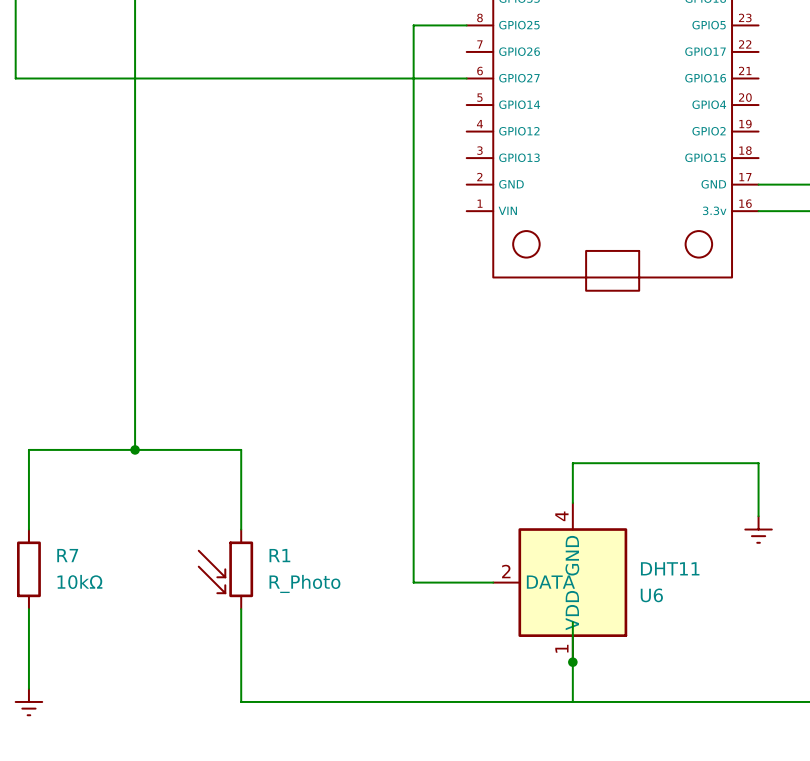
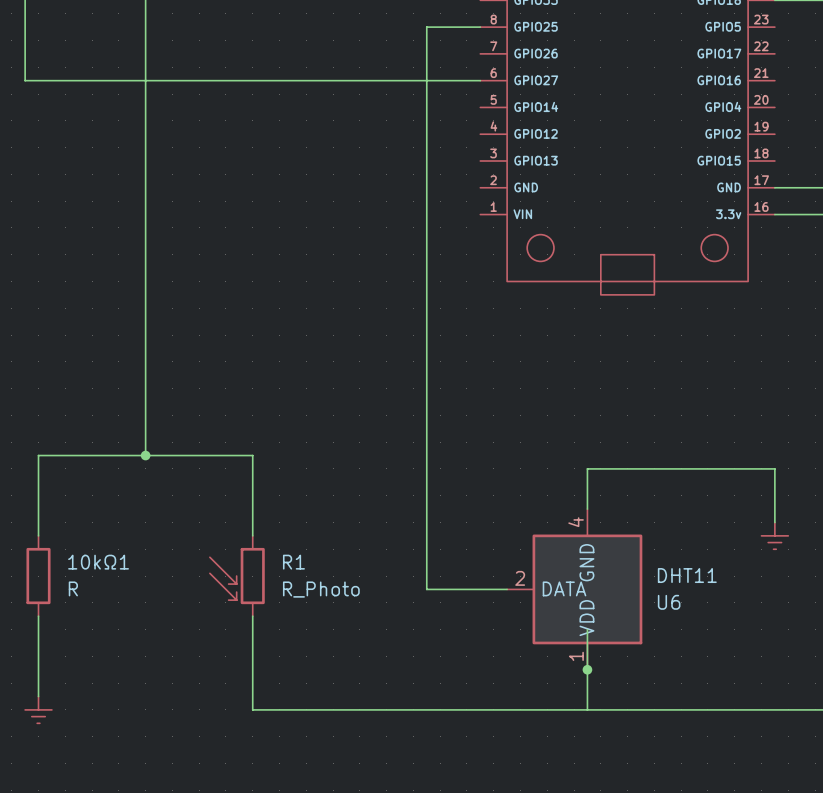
R7 name: R7 (67, 555) -> 10kΩ1 (98, 562)
R7 value: 10kΩ (79, 581) -> R (73, 588)

